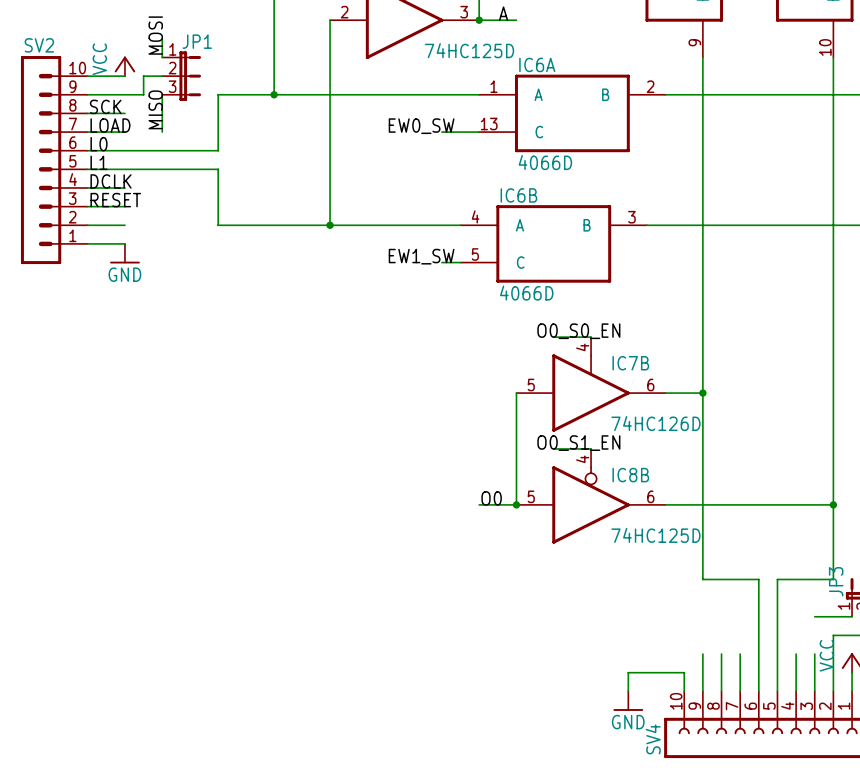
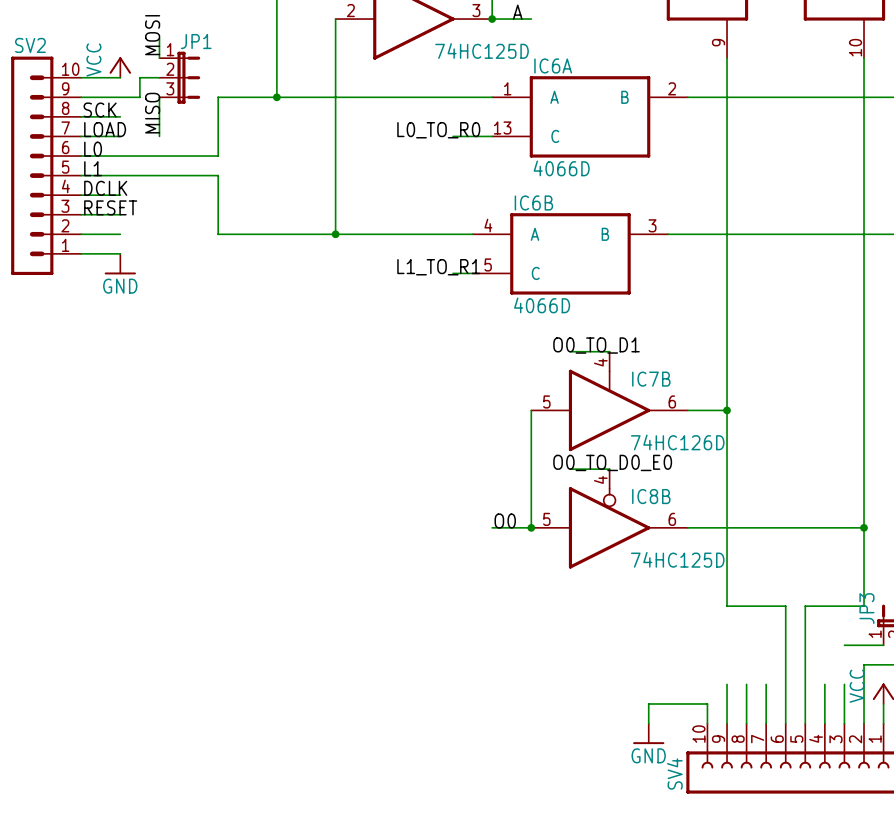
label: EW0_SW (421, 126) -> L0_TO_R0 (438, 130)
label: EW1_SW (421, 256) -> L1_TO_R1 (438, 267)
label: O0_S0_EN (578, 331) -> O0_TO_D1 (596, 345)
label: O0_S1_EN (578, 443) -> O0_TO_D0_E0 (612, 462)

